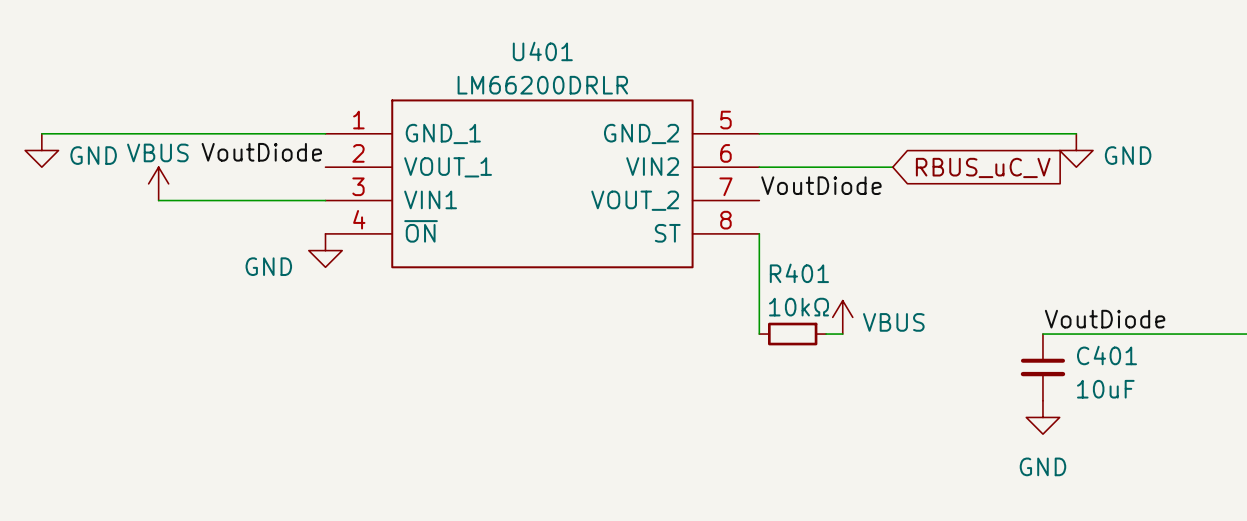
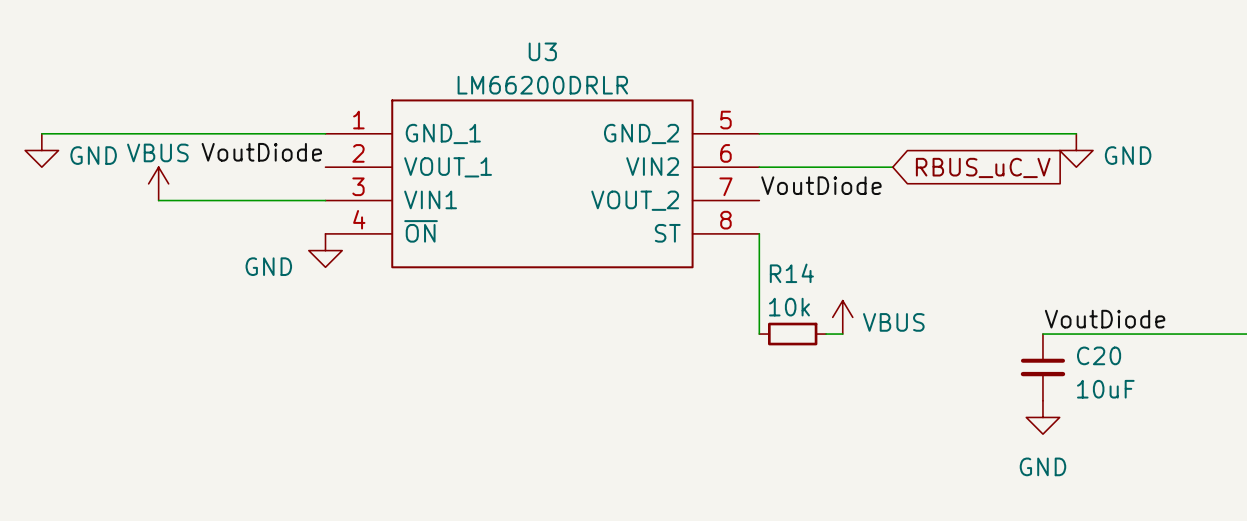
U401 name: U401 (542, 51) -> U3 (542, 51)
R401 name: R401 (799, 273) -> R14 (791, 273)
R401 value: 10kΩ (799, 307) -> 10k (789, 307)
C401 name: C401 (1107, 355) -> C20 (1099, 355)

